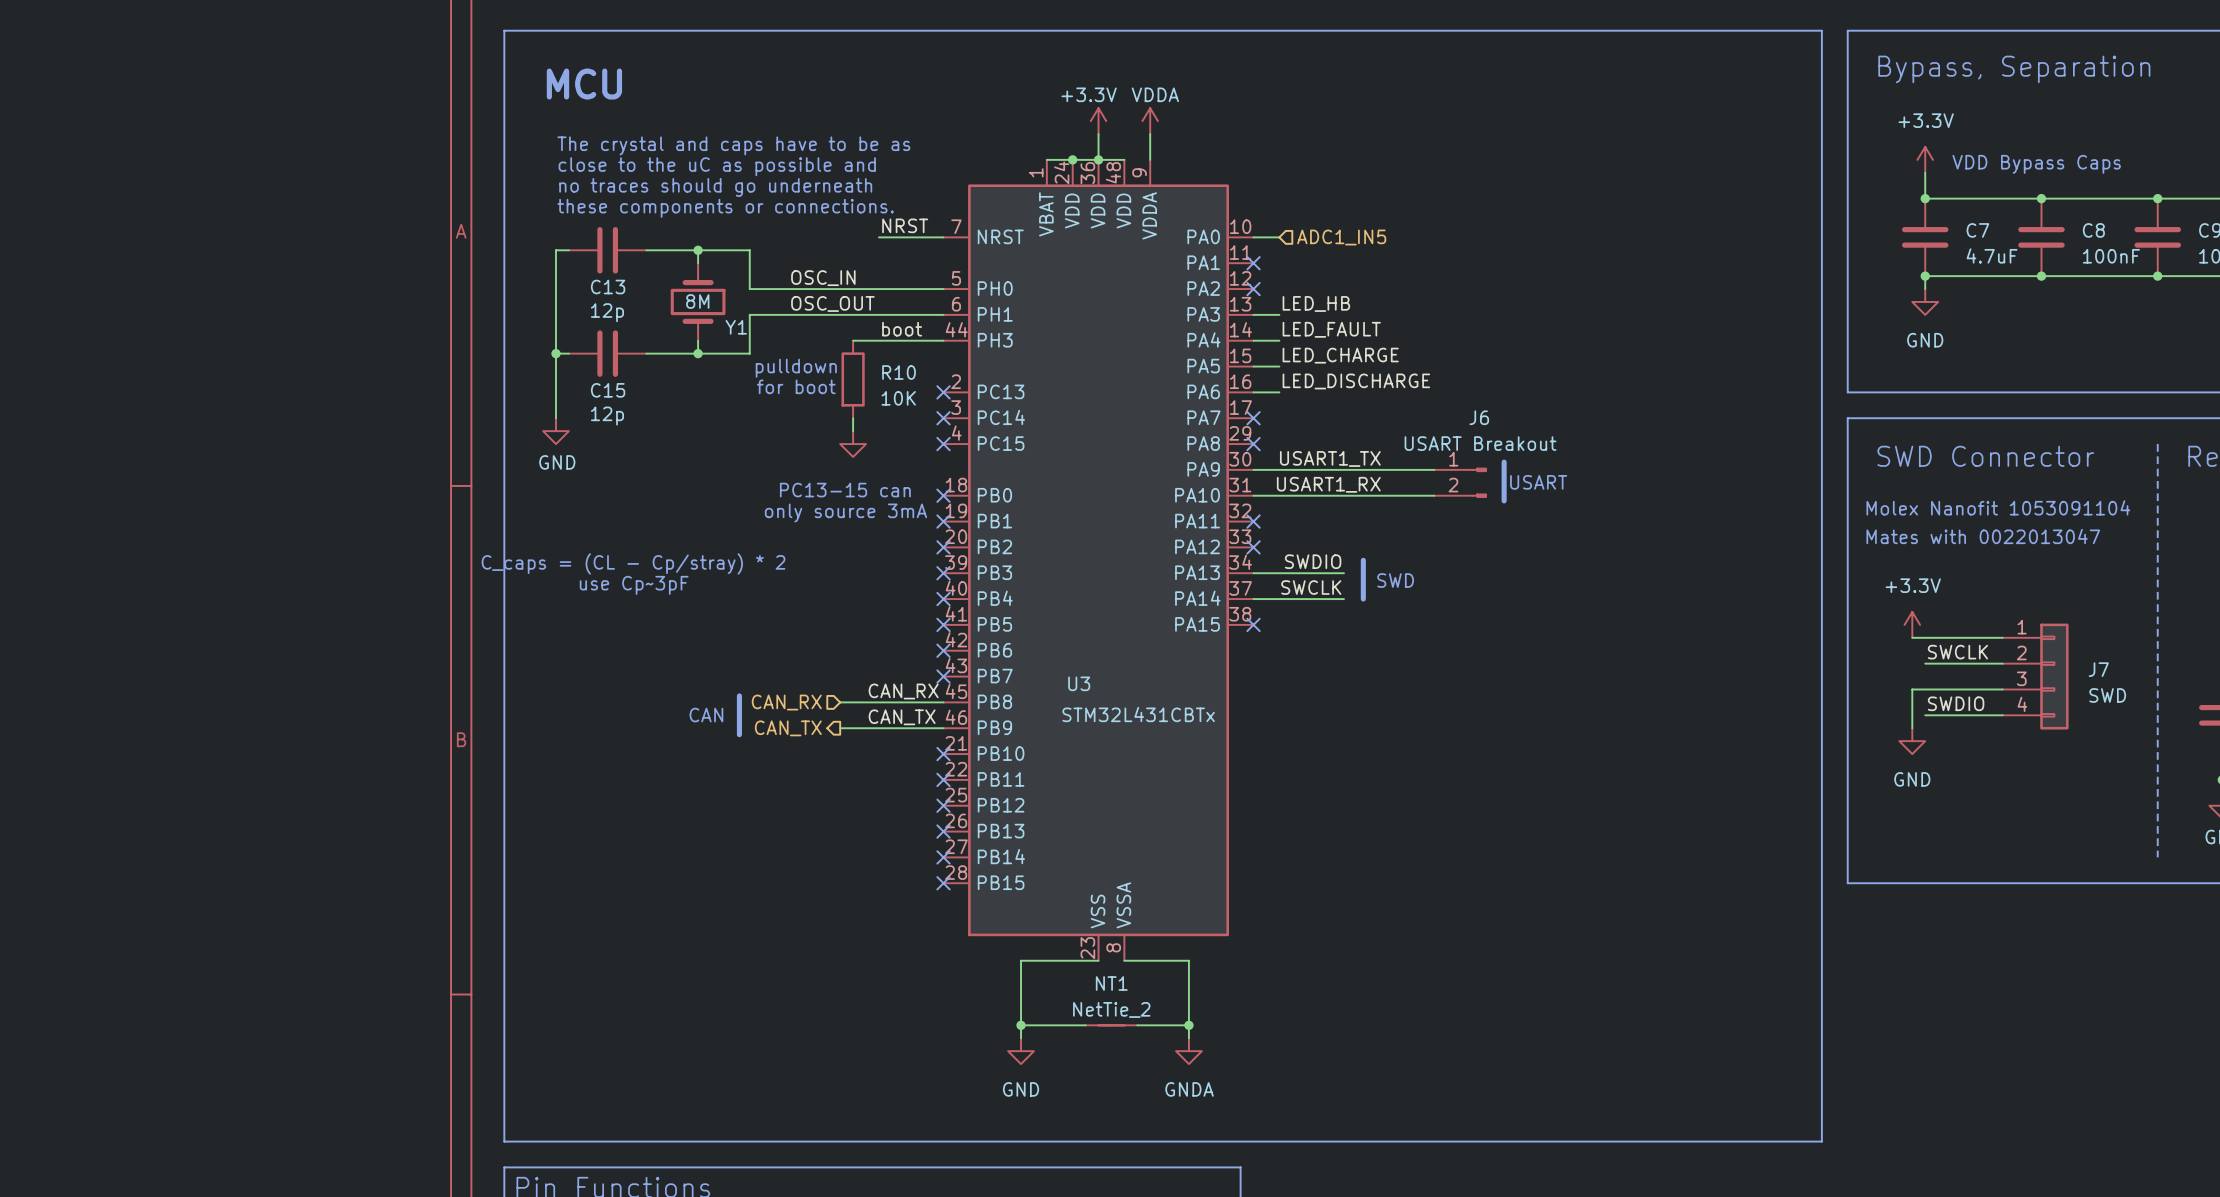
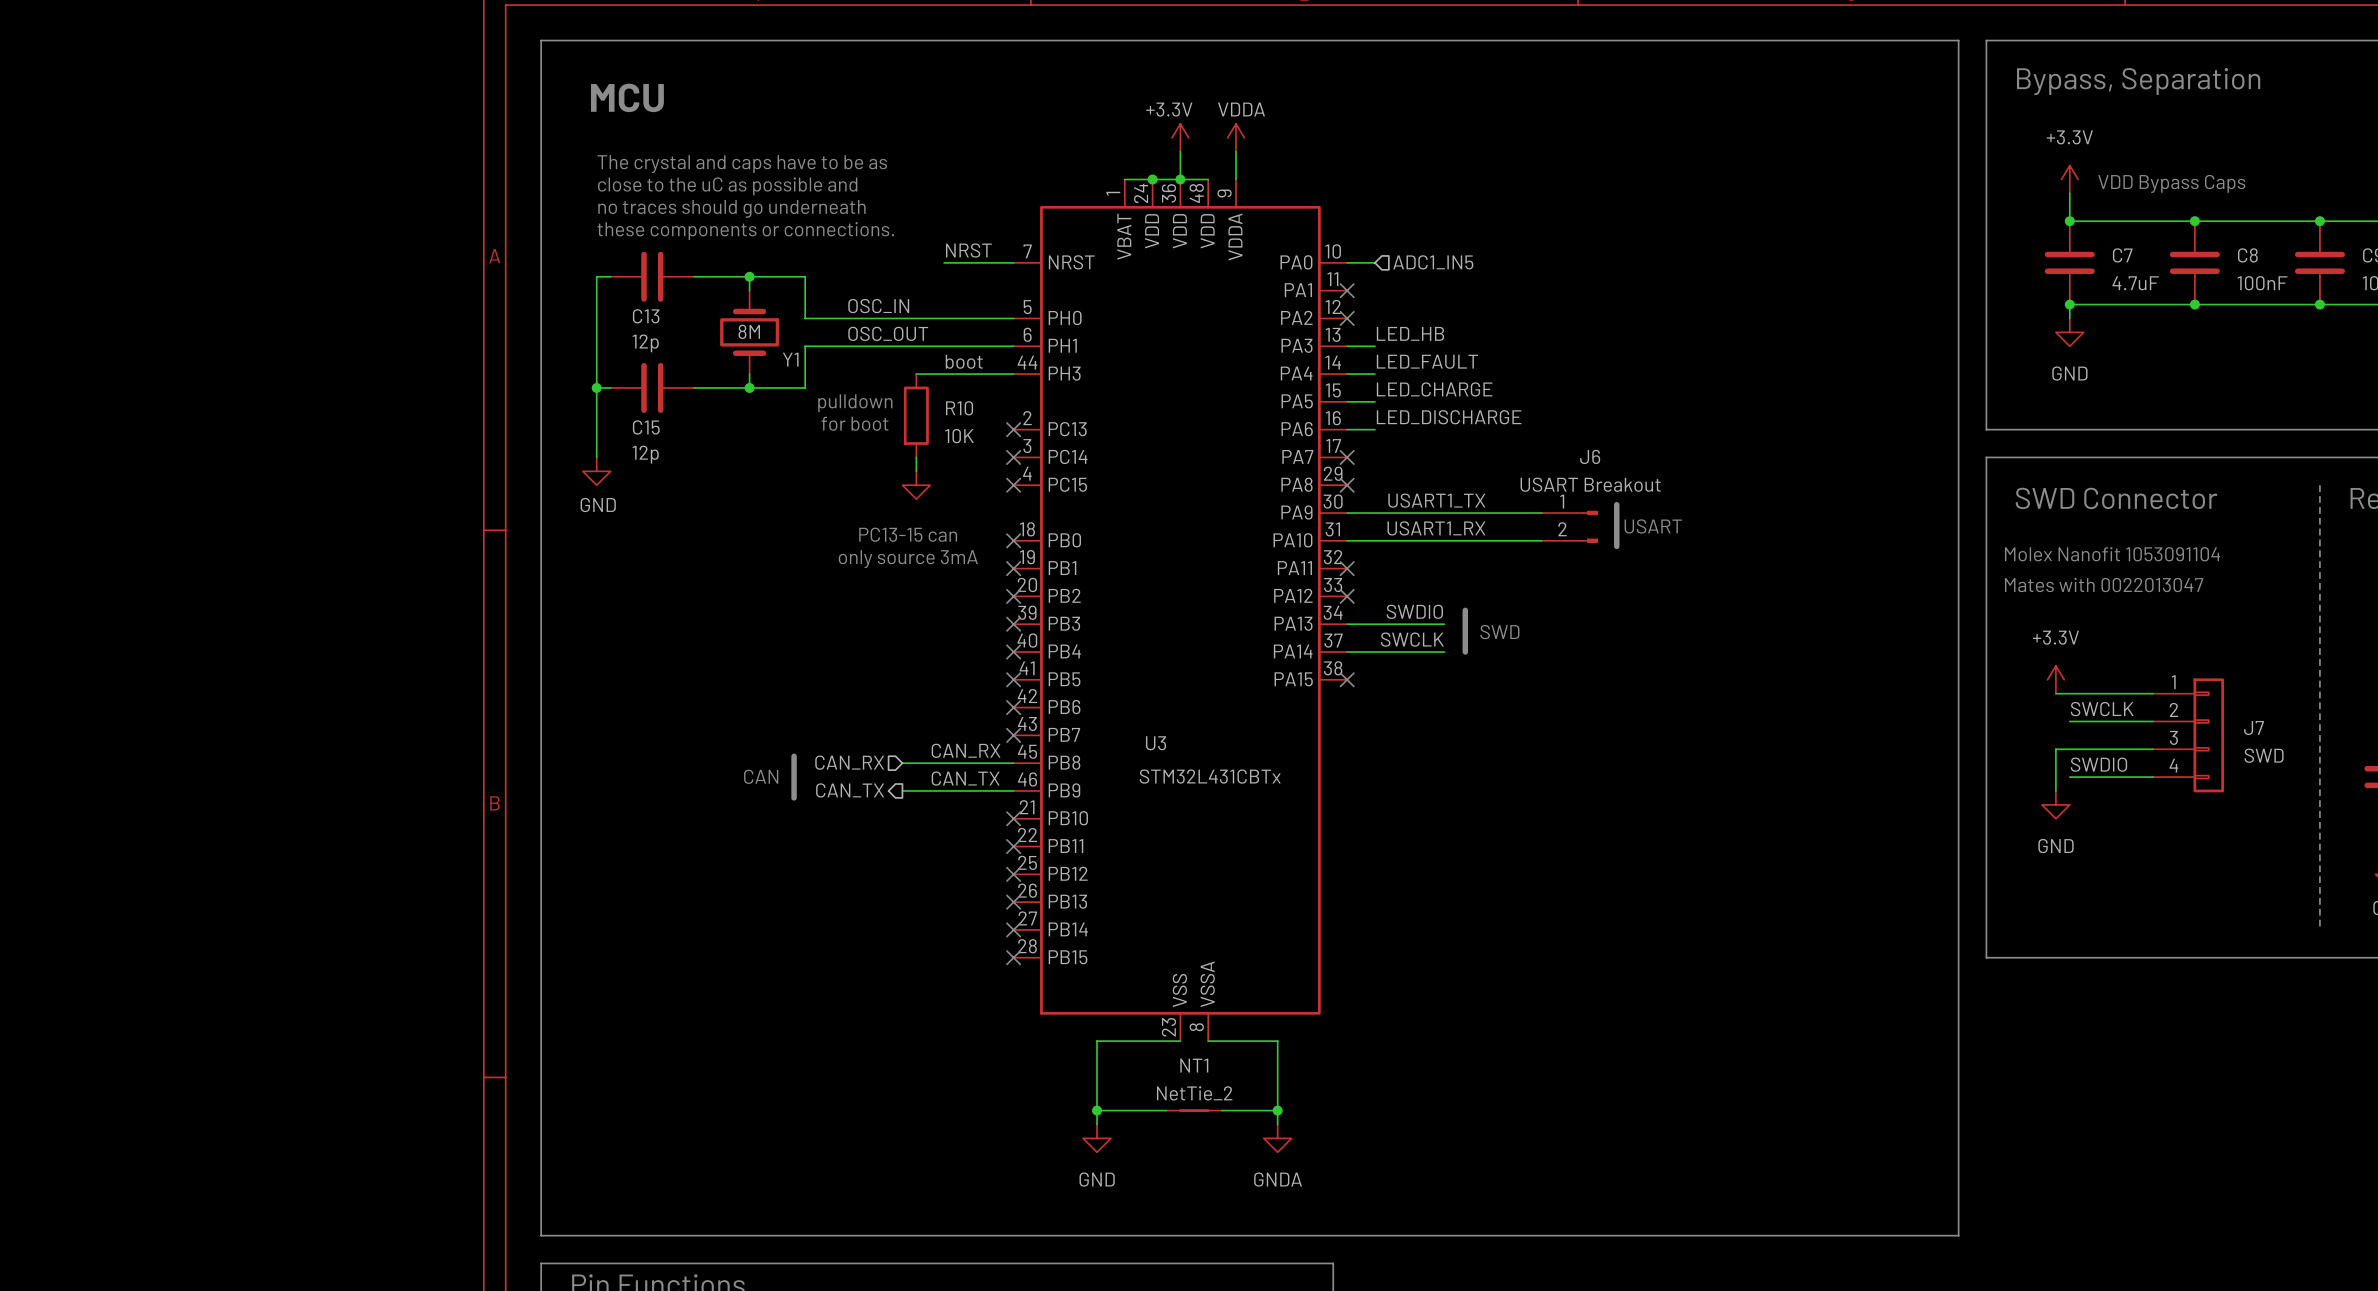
text: C_caps = (CL - Cp/stray) * 2 (633, 563) -> none
text: use Cp~3pF (634, 585) -> none

